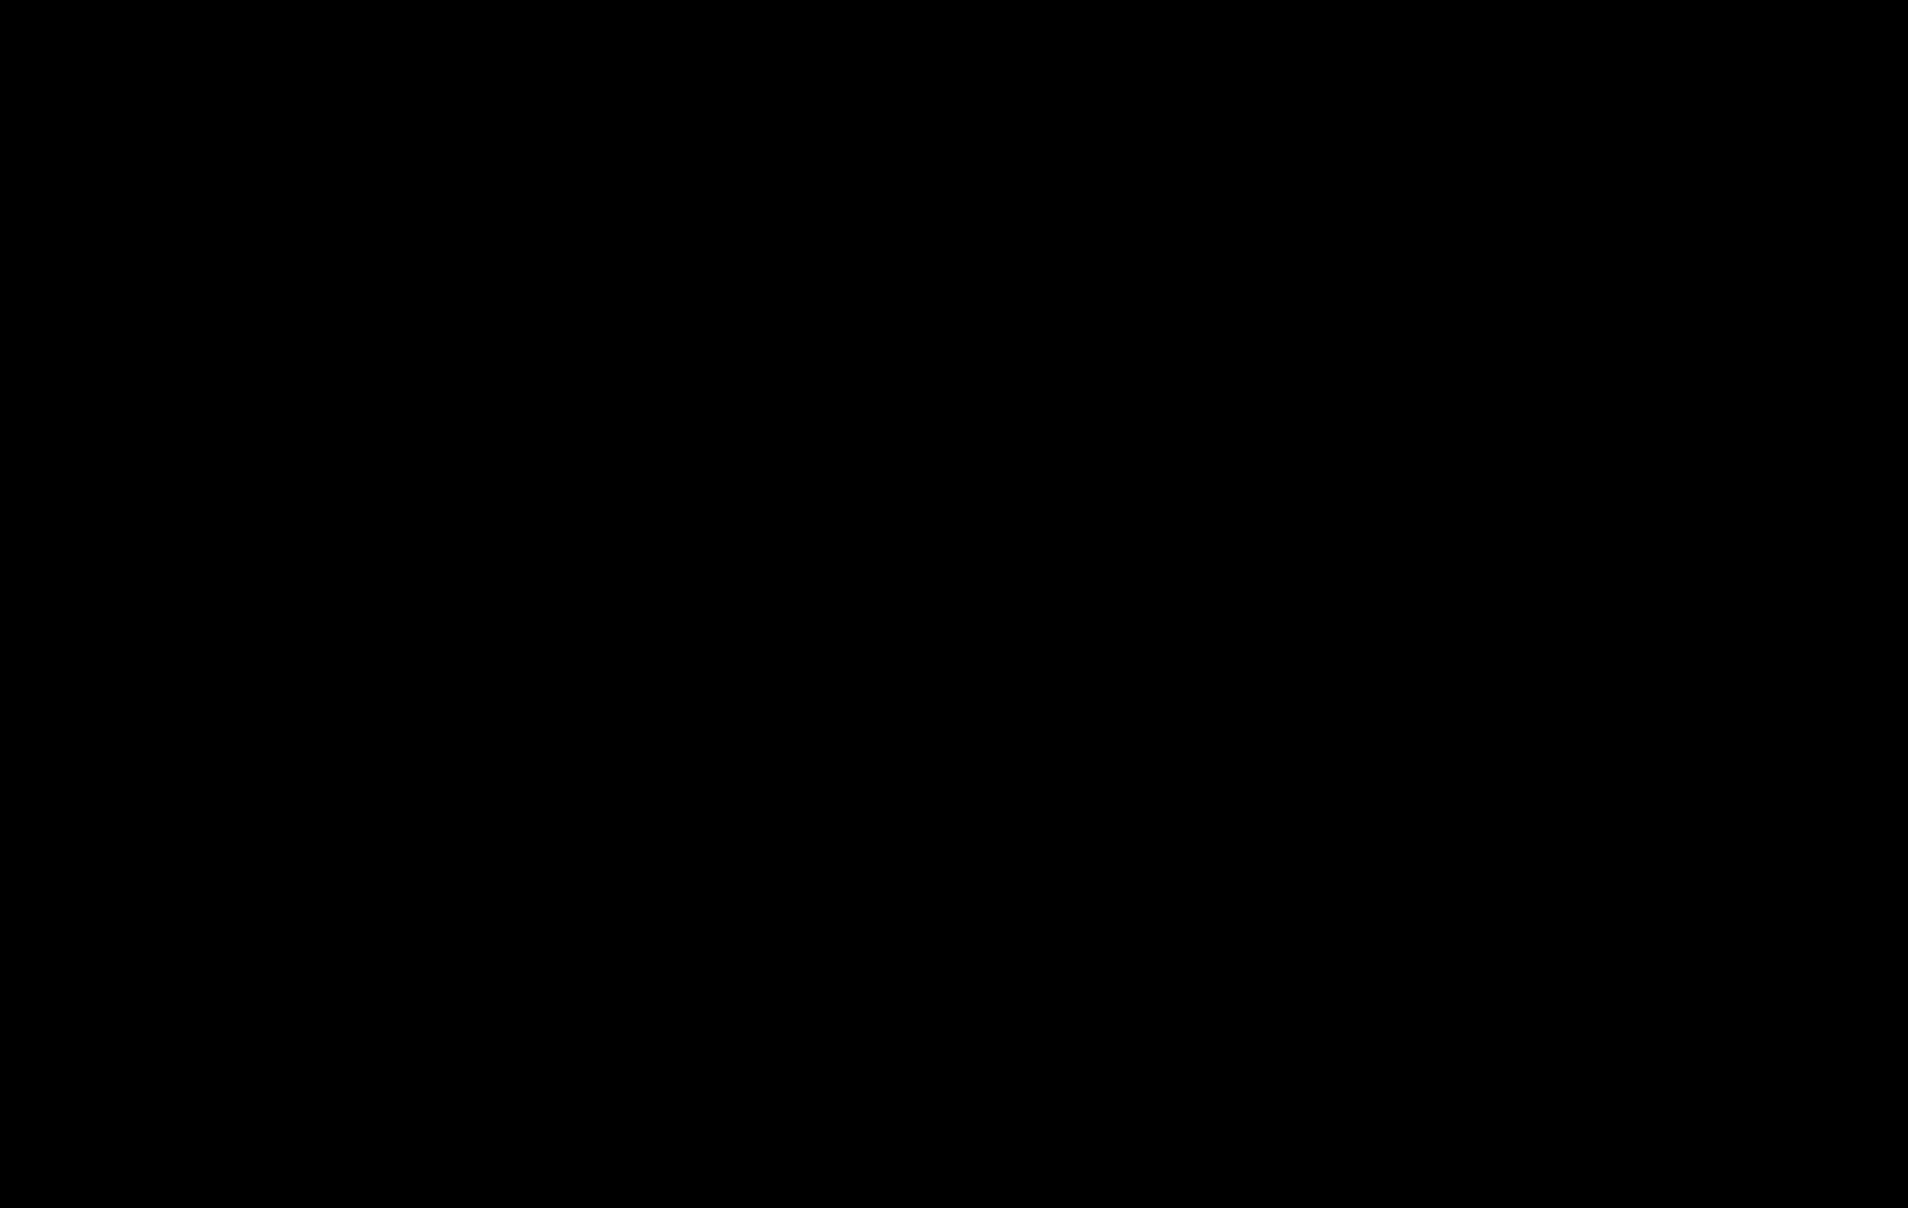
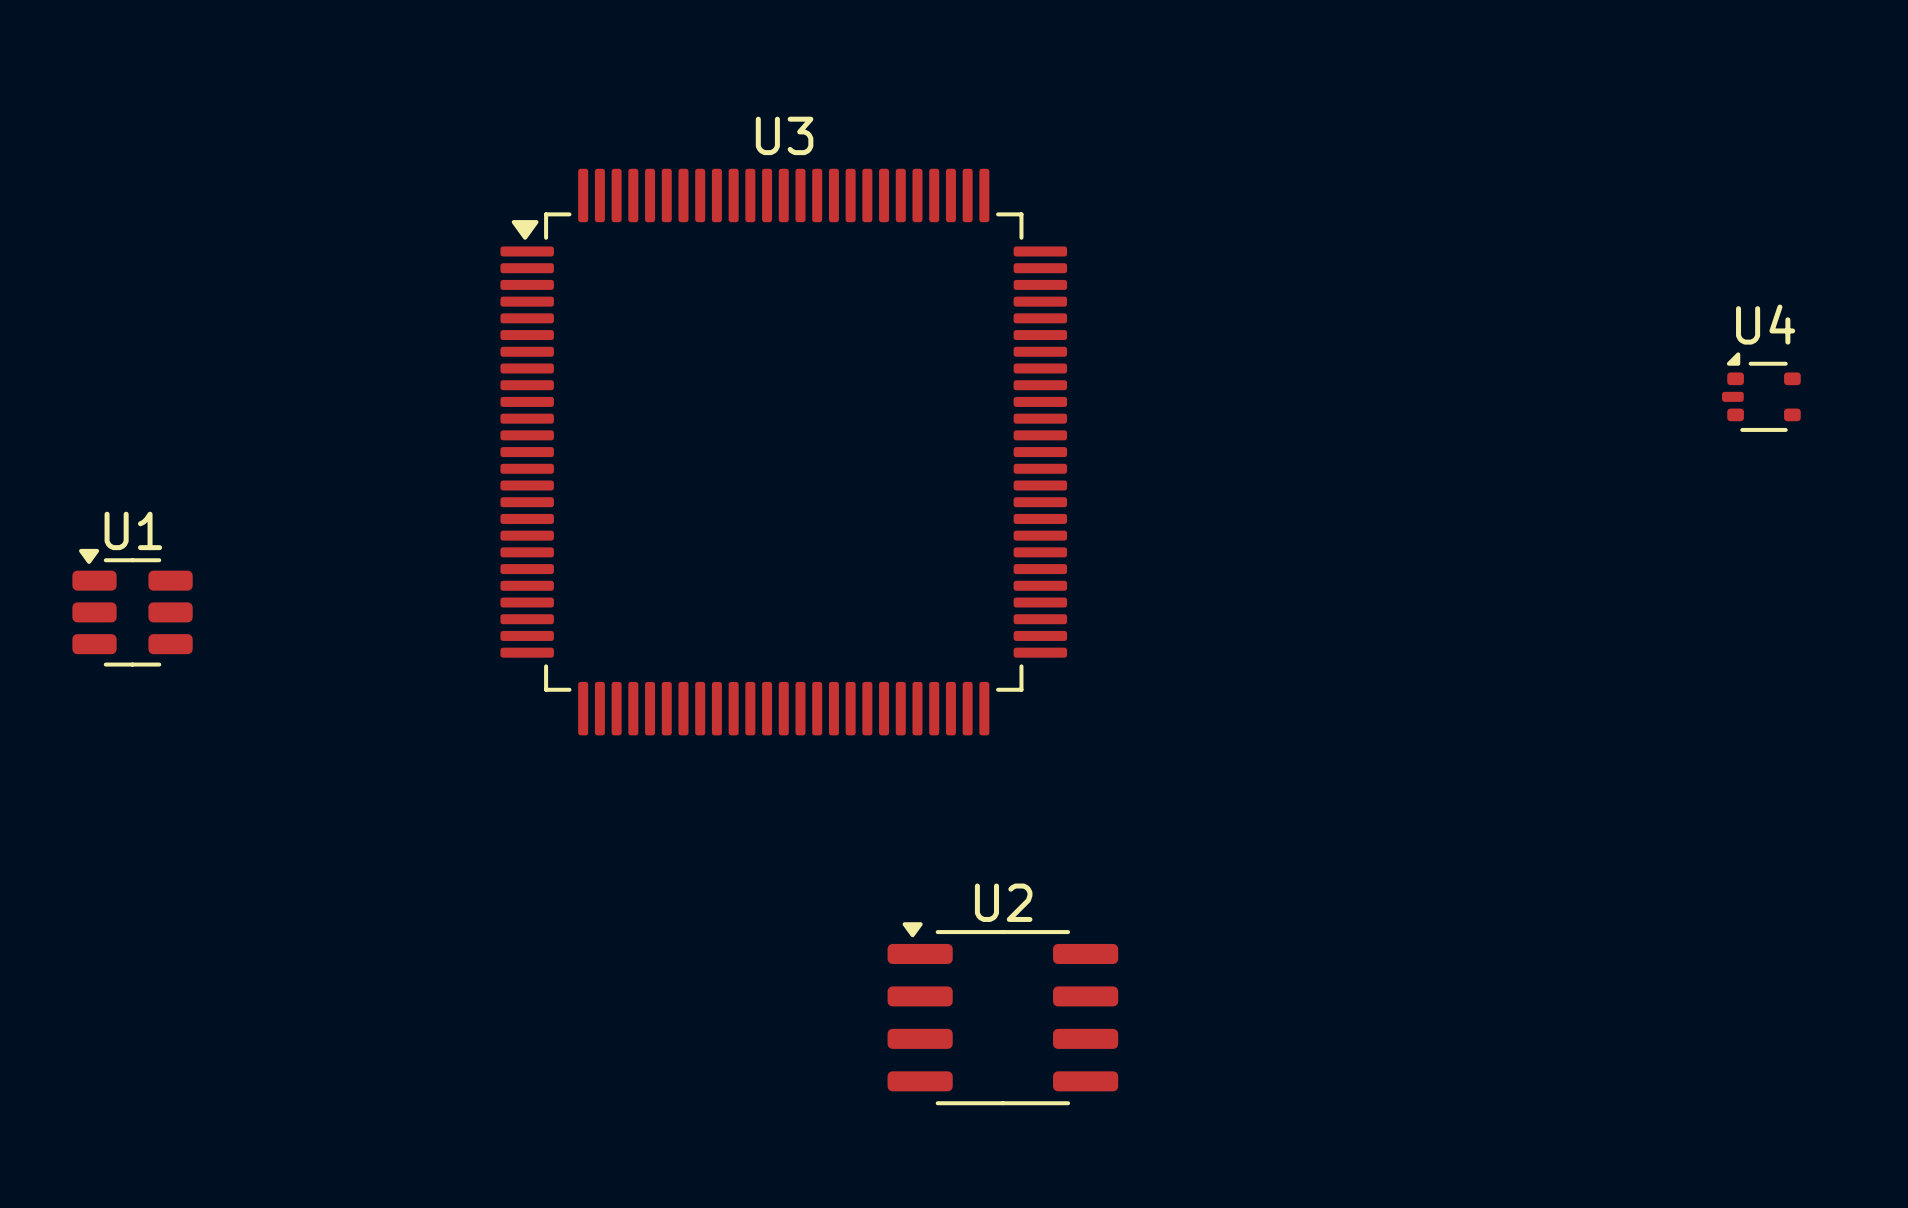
U4: none -> (1761, 392)
U3: none -> (783, 452)
U1: none -> (132, 607)
U2: none -> (1002, 1013)

